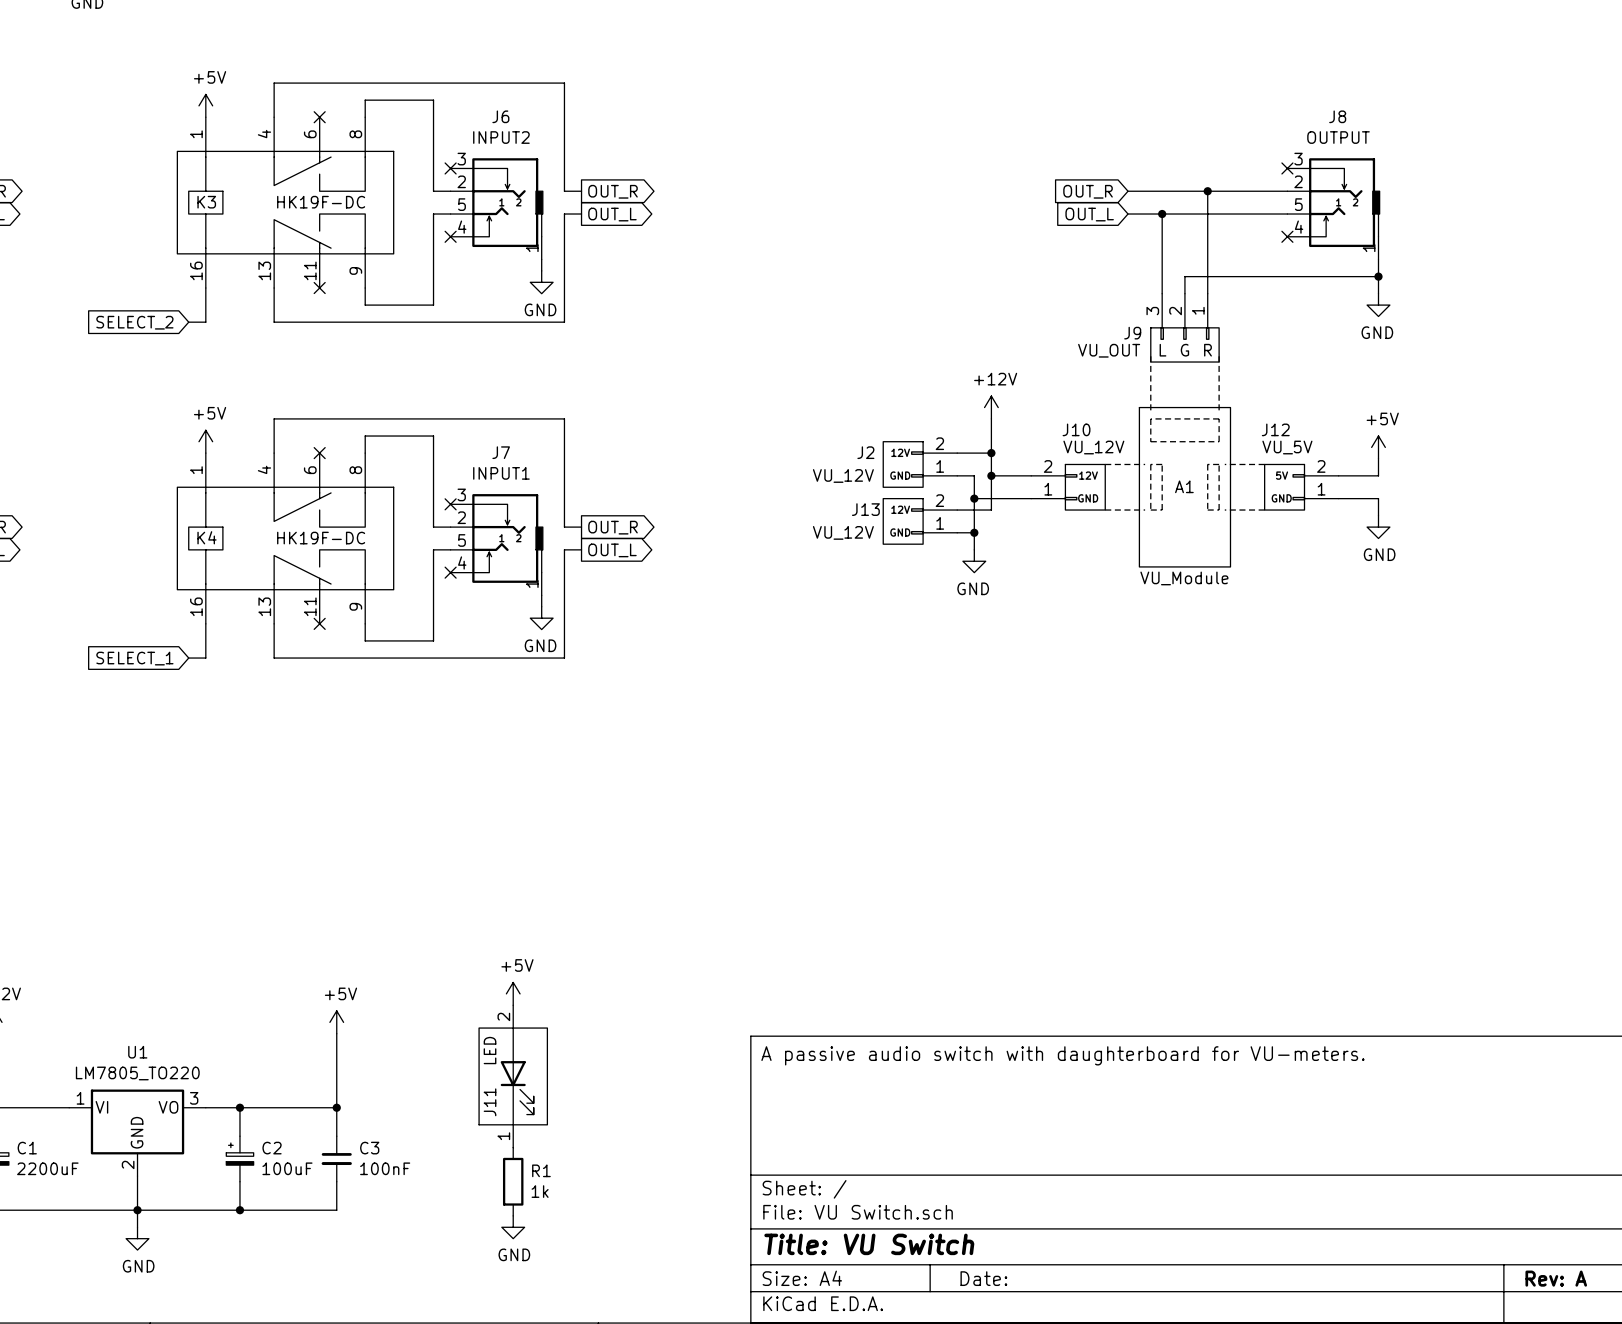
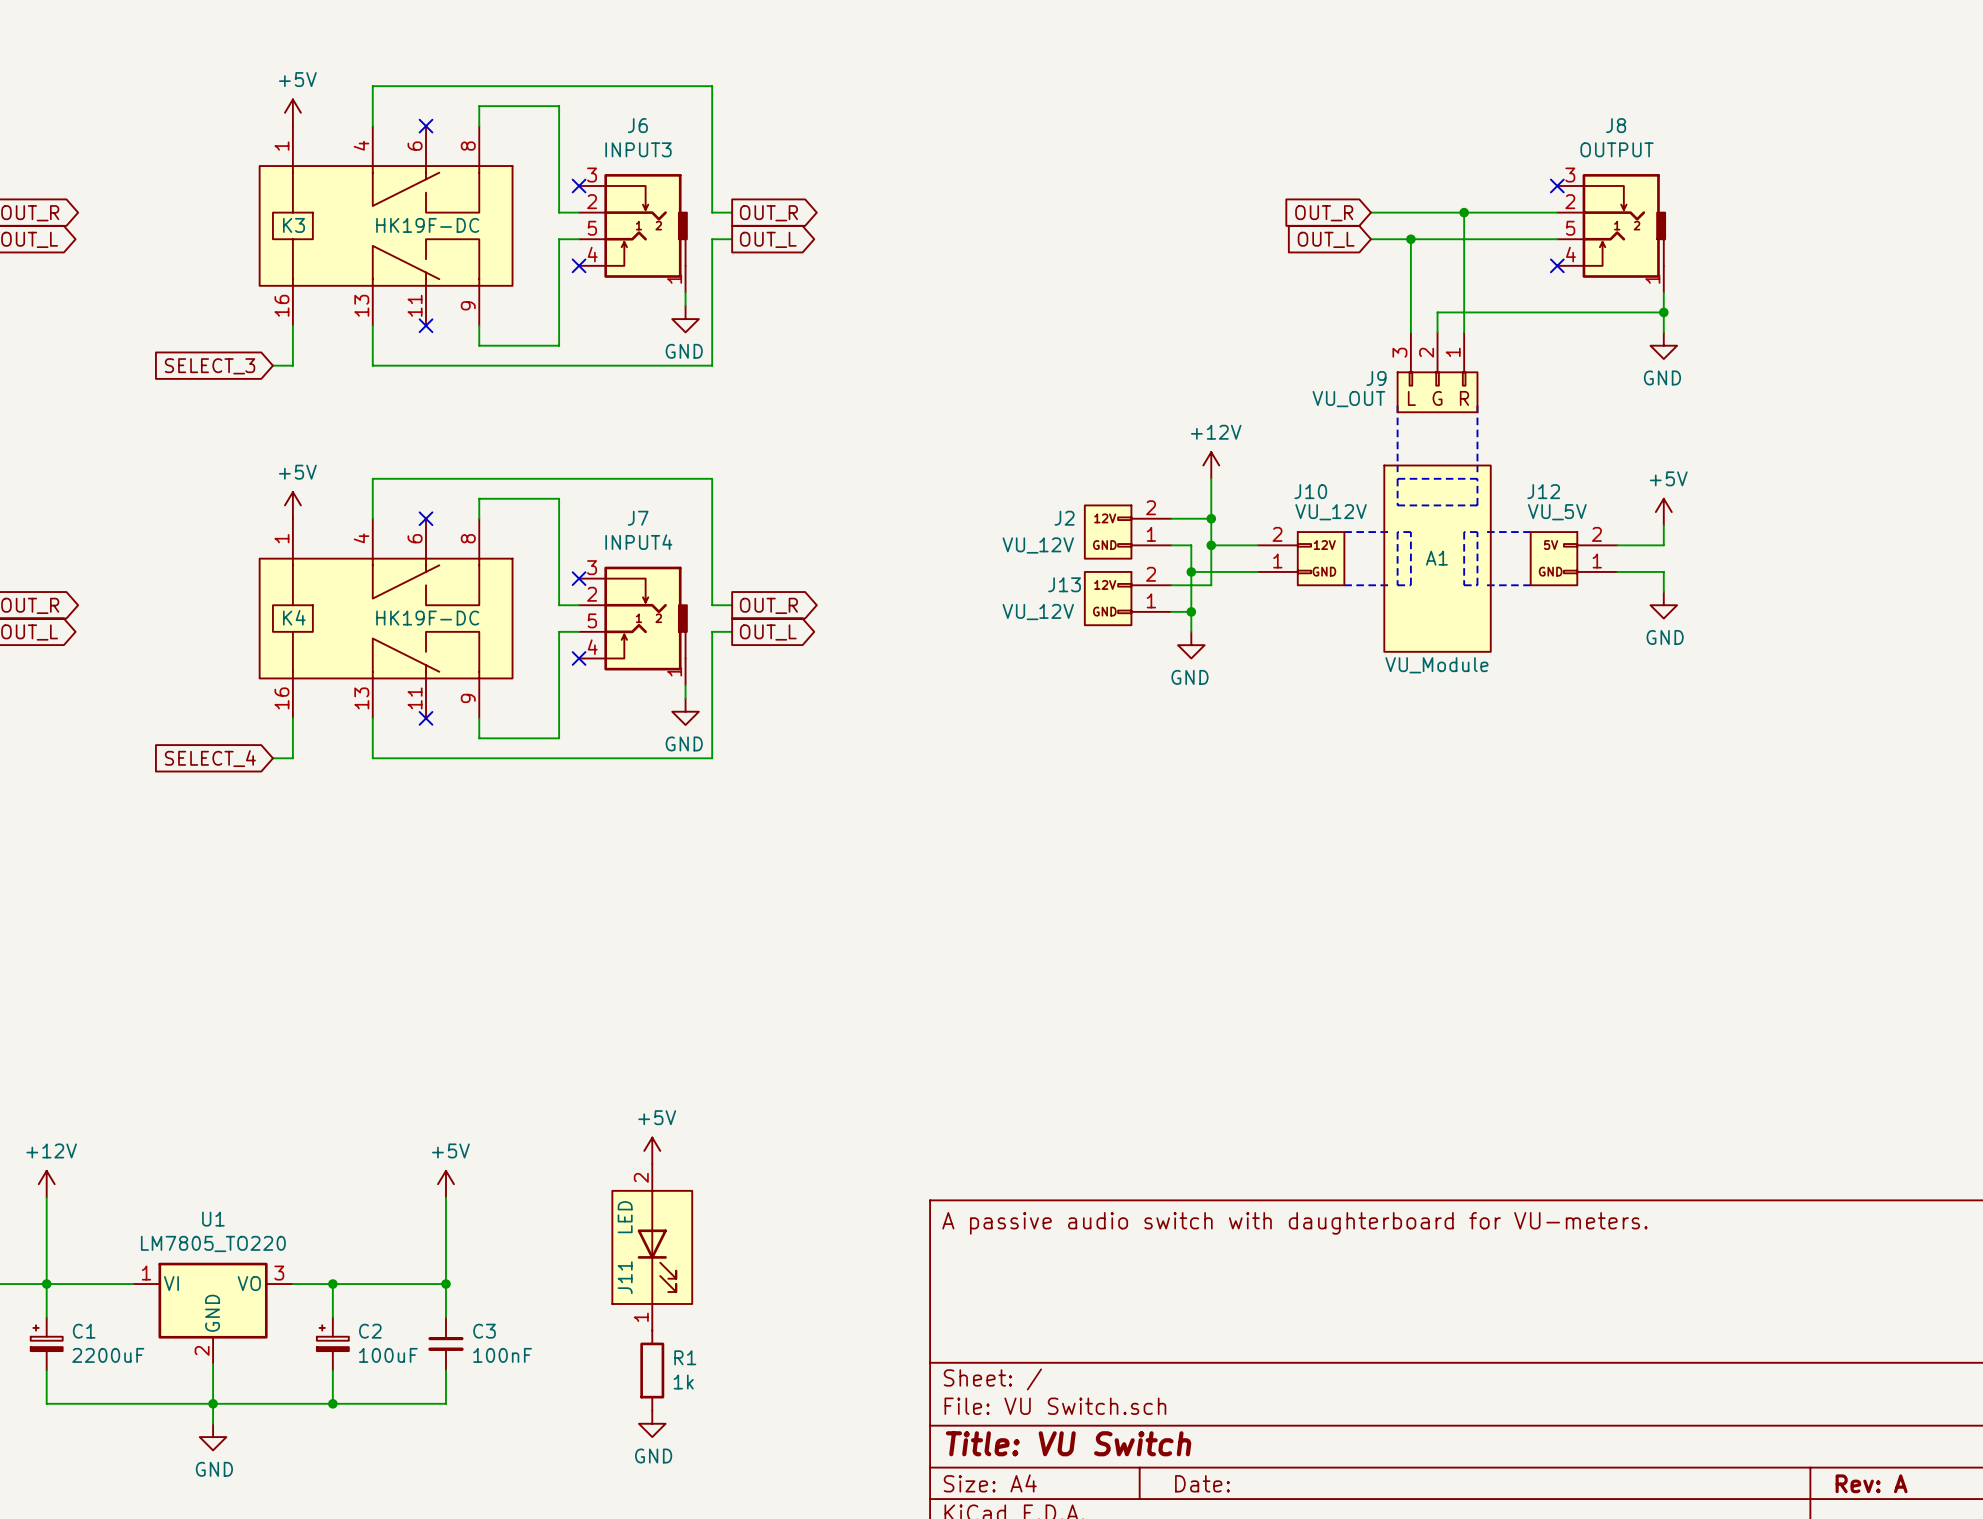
J6 value: INPUT2 (501, 137) -> INPUT3 (638, 149)
global label: SELECT_2 (134, 322) -> SELECT_3 (210, 366)
J7 value: INPUT1 (501, 473) -> INPUT4 (638, 542)
global label: SELECT_1 (134, 658) -> SELECT_4 (210, 758)

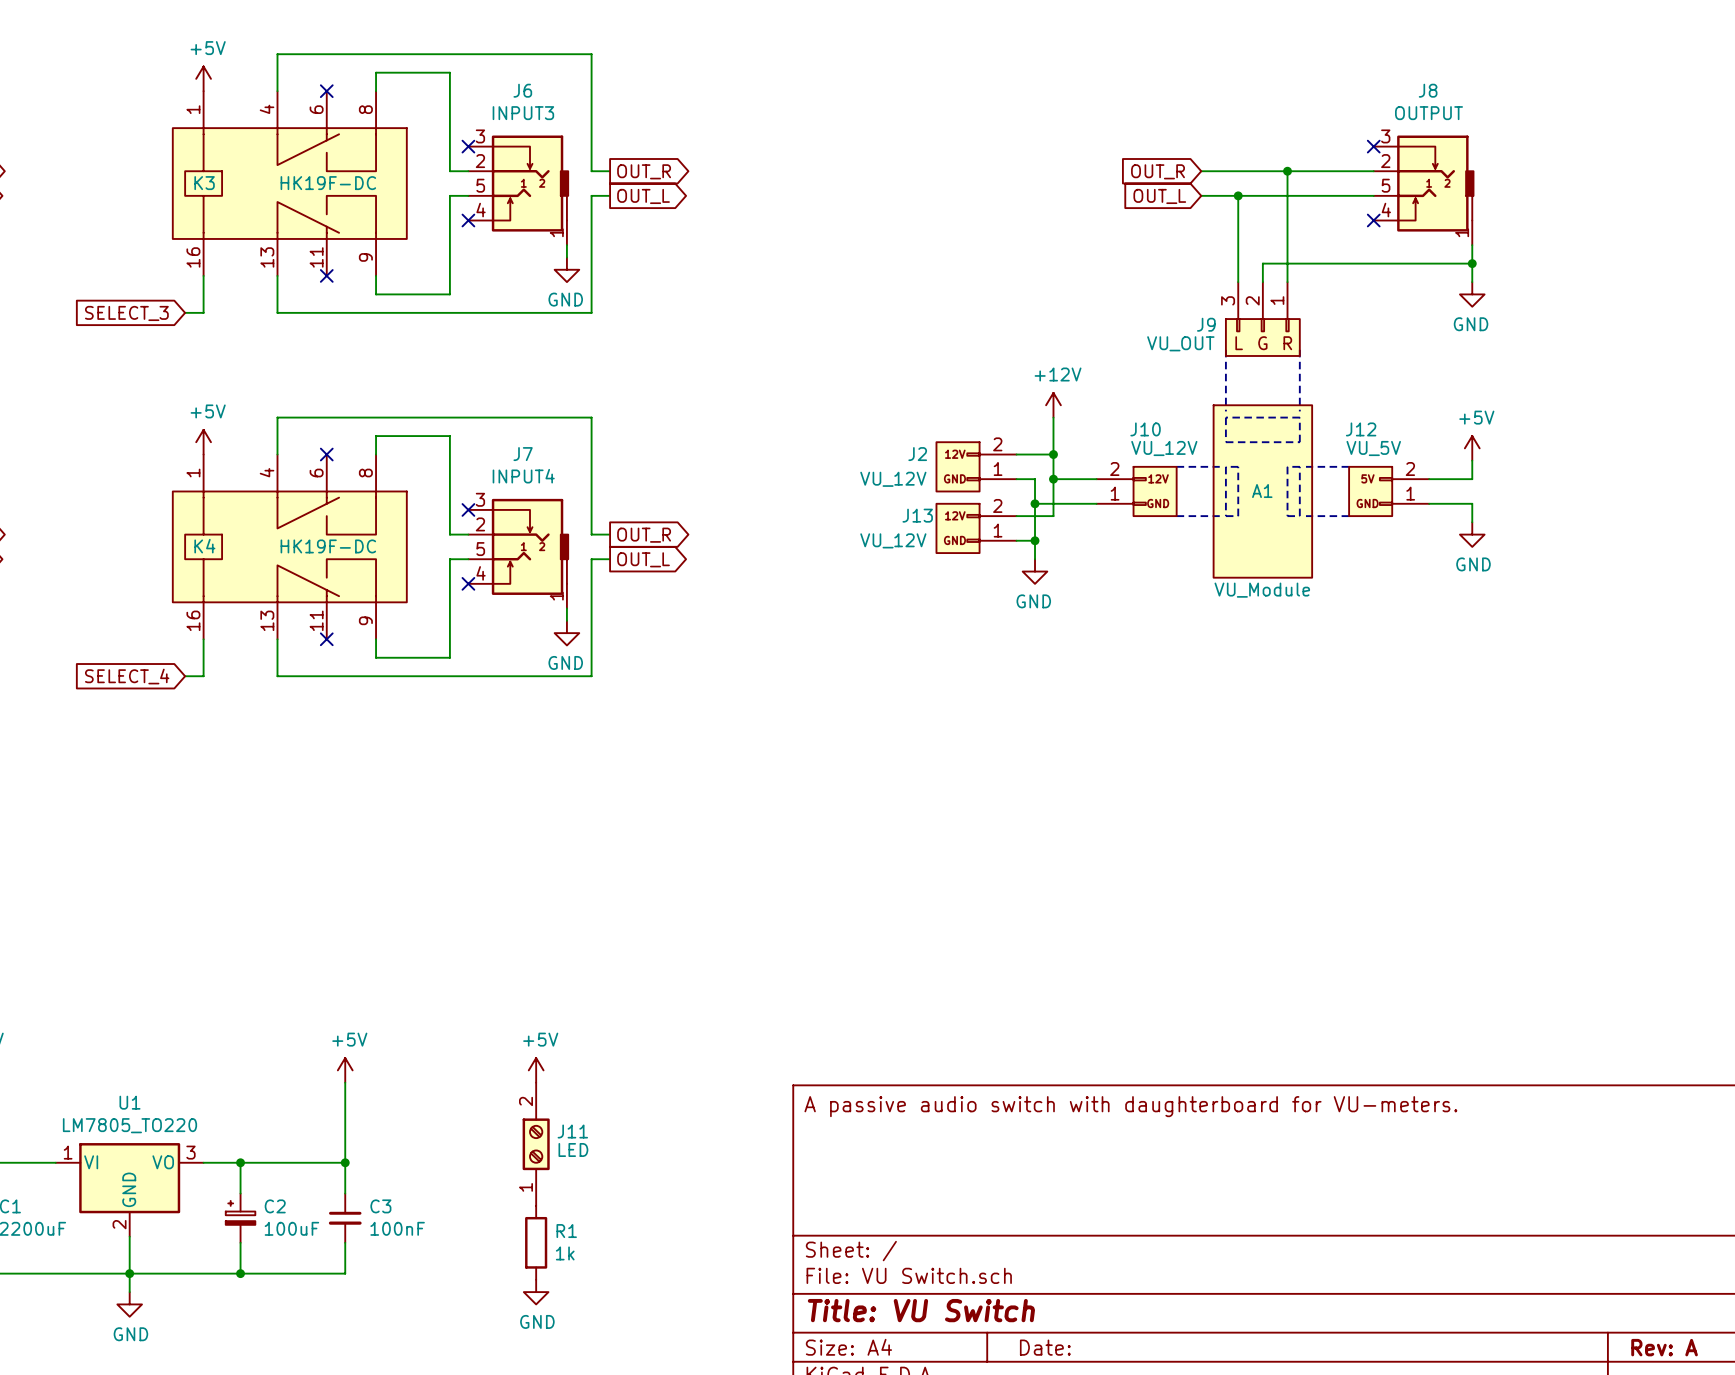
power symbol position: +5V (652, 1150) -> +5V (536, 1070)
J11 symbol: [612, 1164, 693, 1331] -> [522, 1082, 550, 1206]
J11 value position: LED (625, 1217) -> LED (573, 1149)
J11 name position: J11 (625, 1277) -> J11 (572, 1131)

